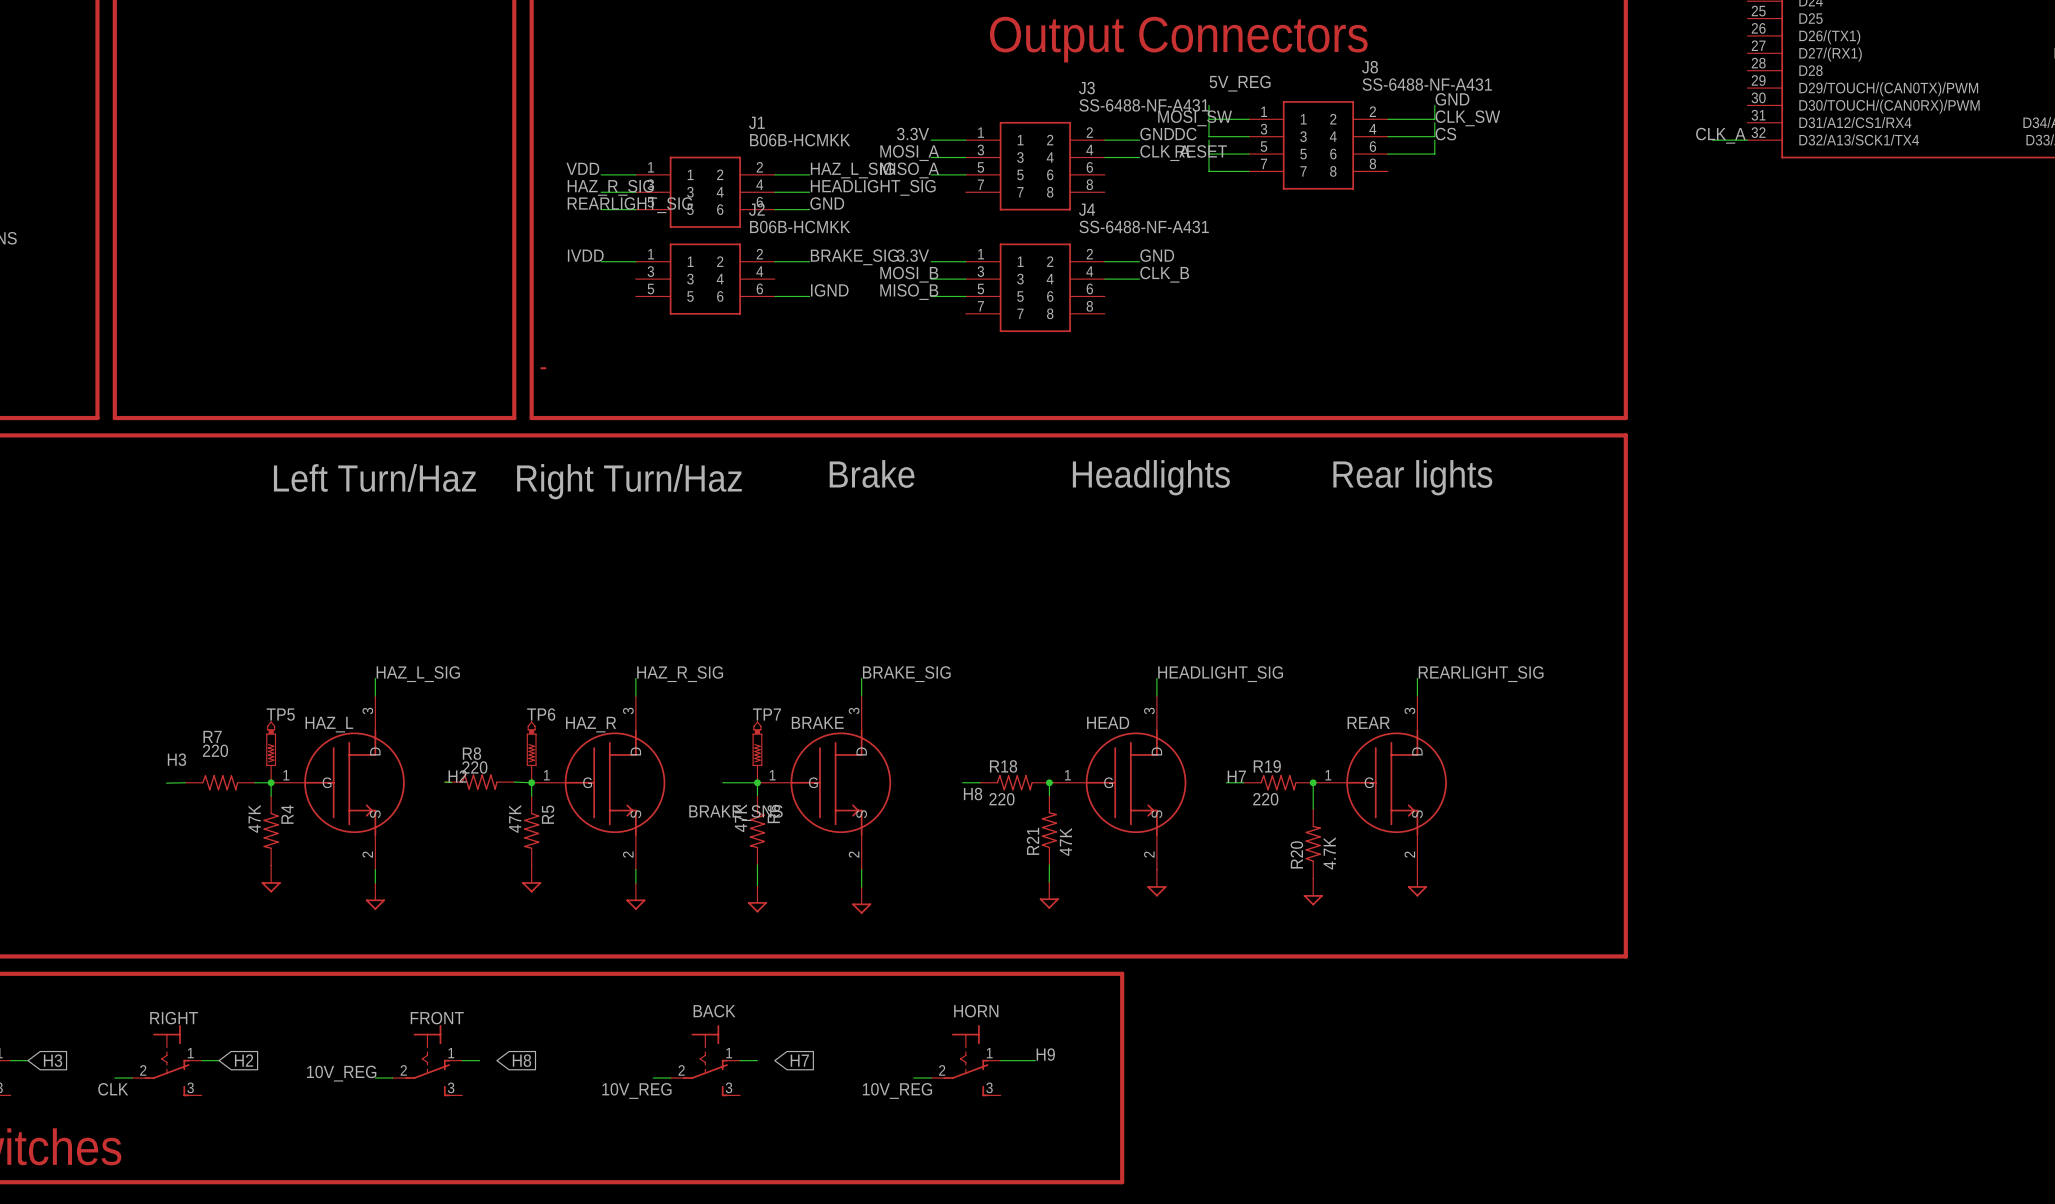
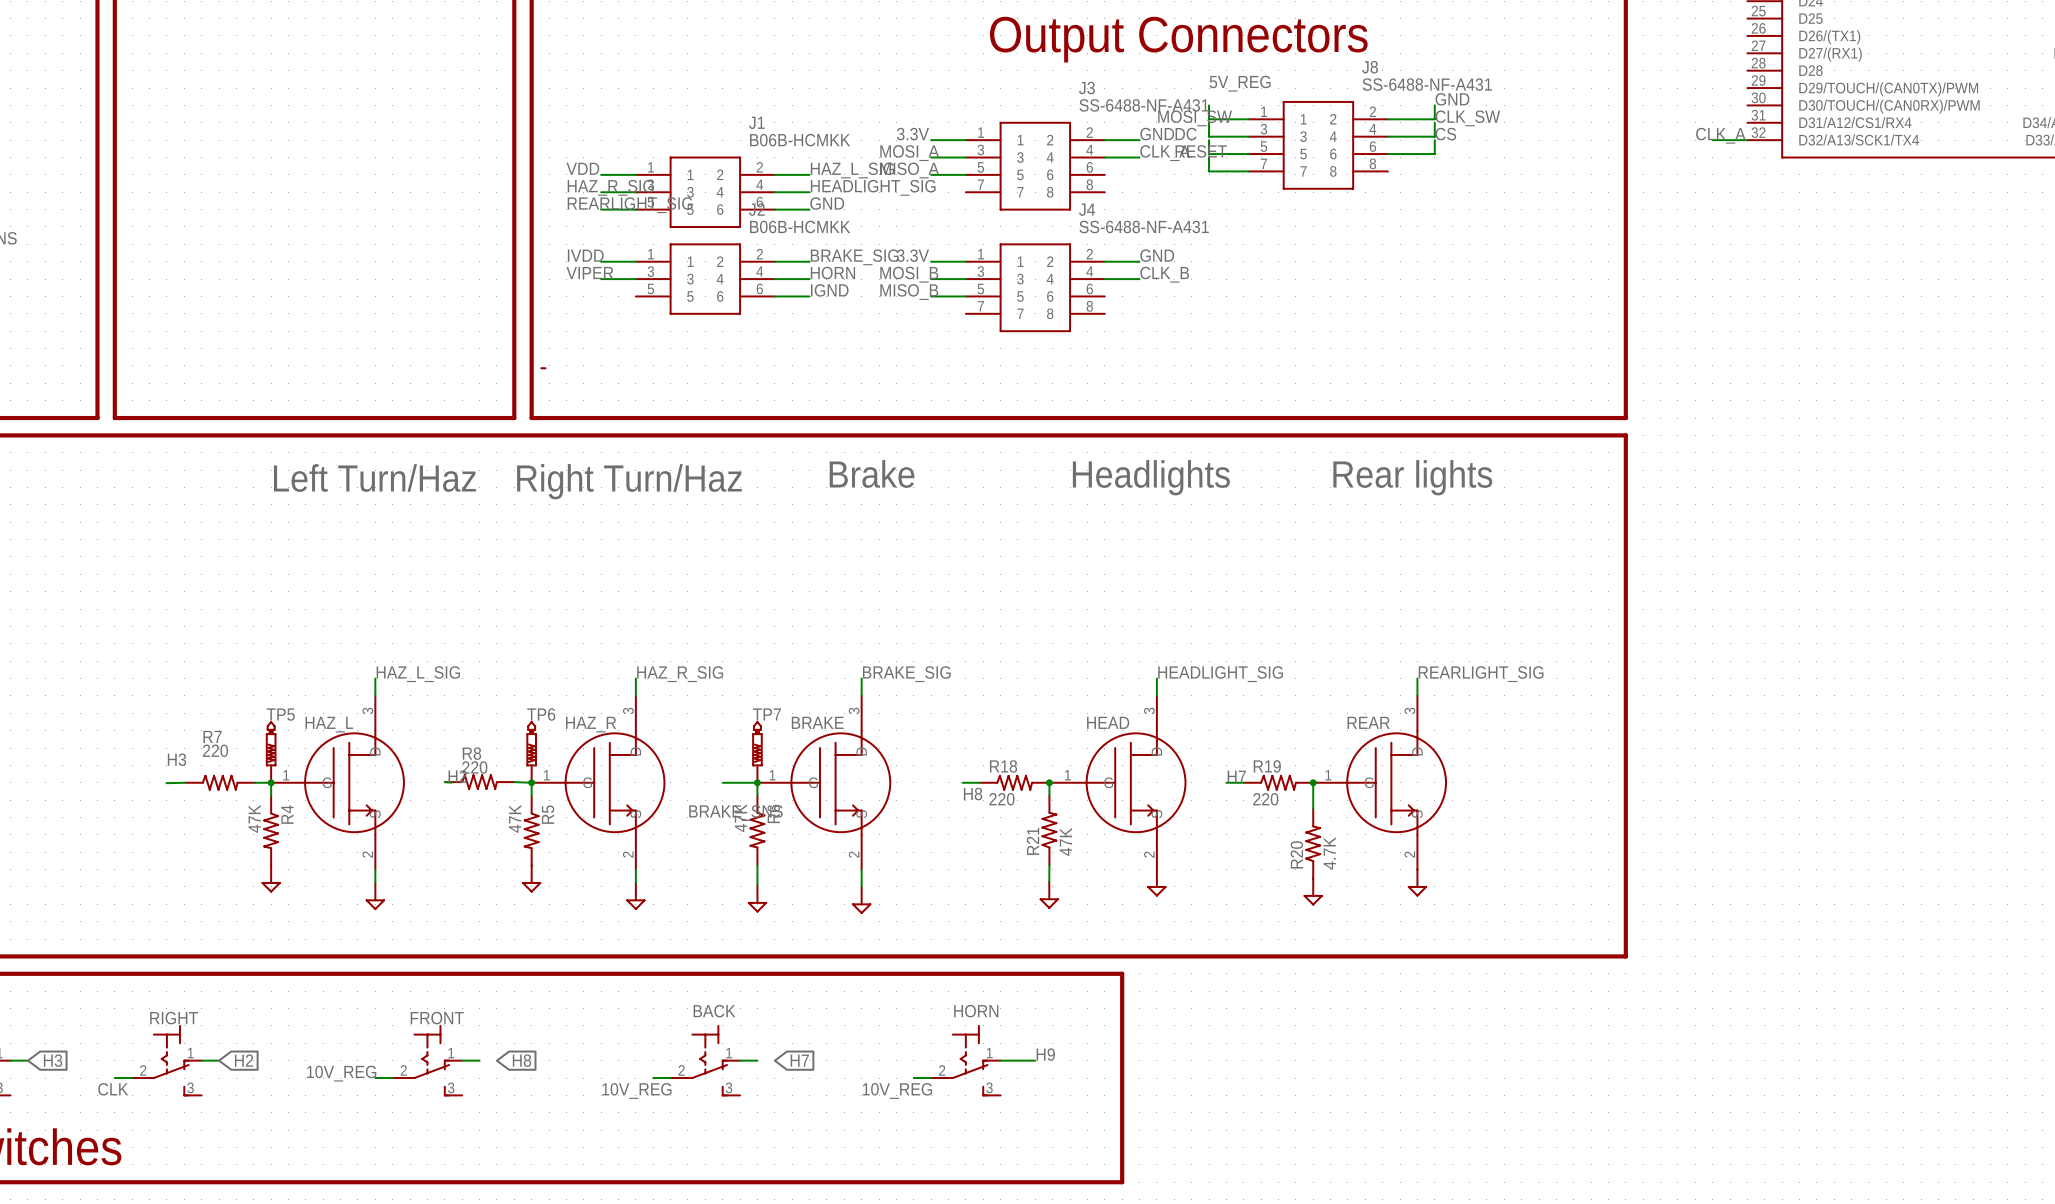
label: none -> VIPER (589, 273)
label: none -> HORN (832, 273)
wire: none -> (601, 279) (635, 279)
wire: none -> (774, 279) (809, 279)

